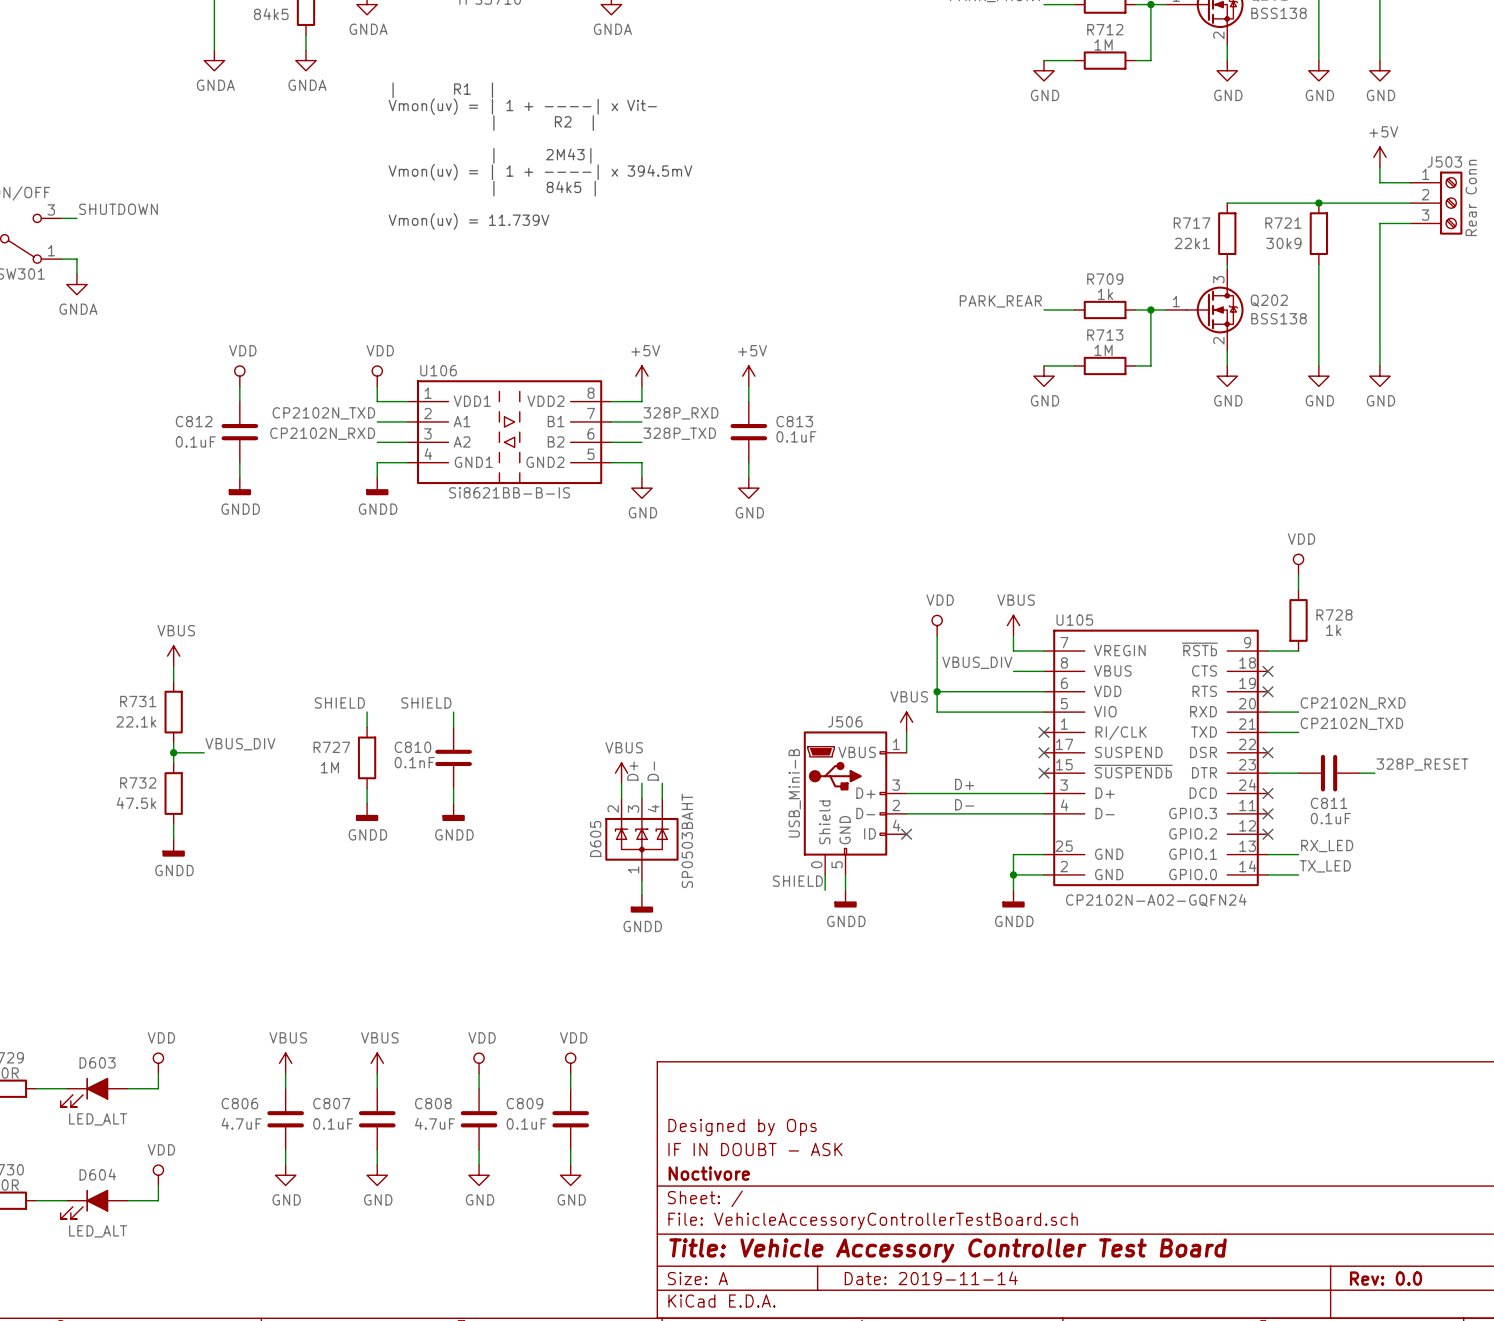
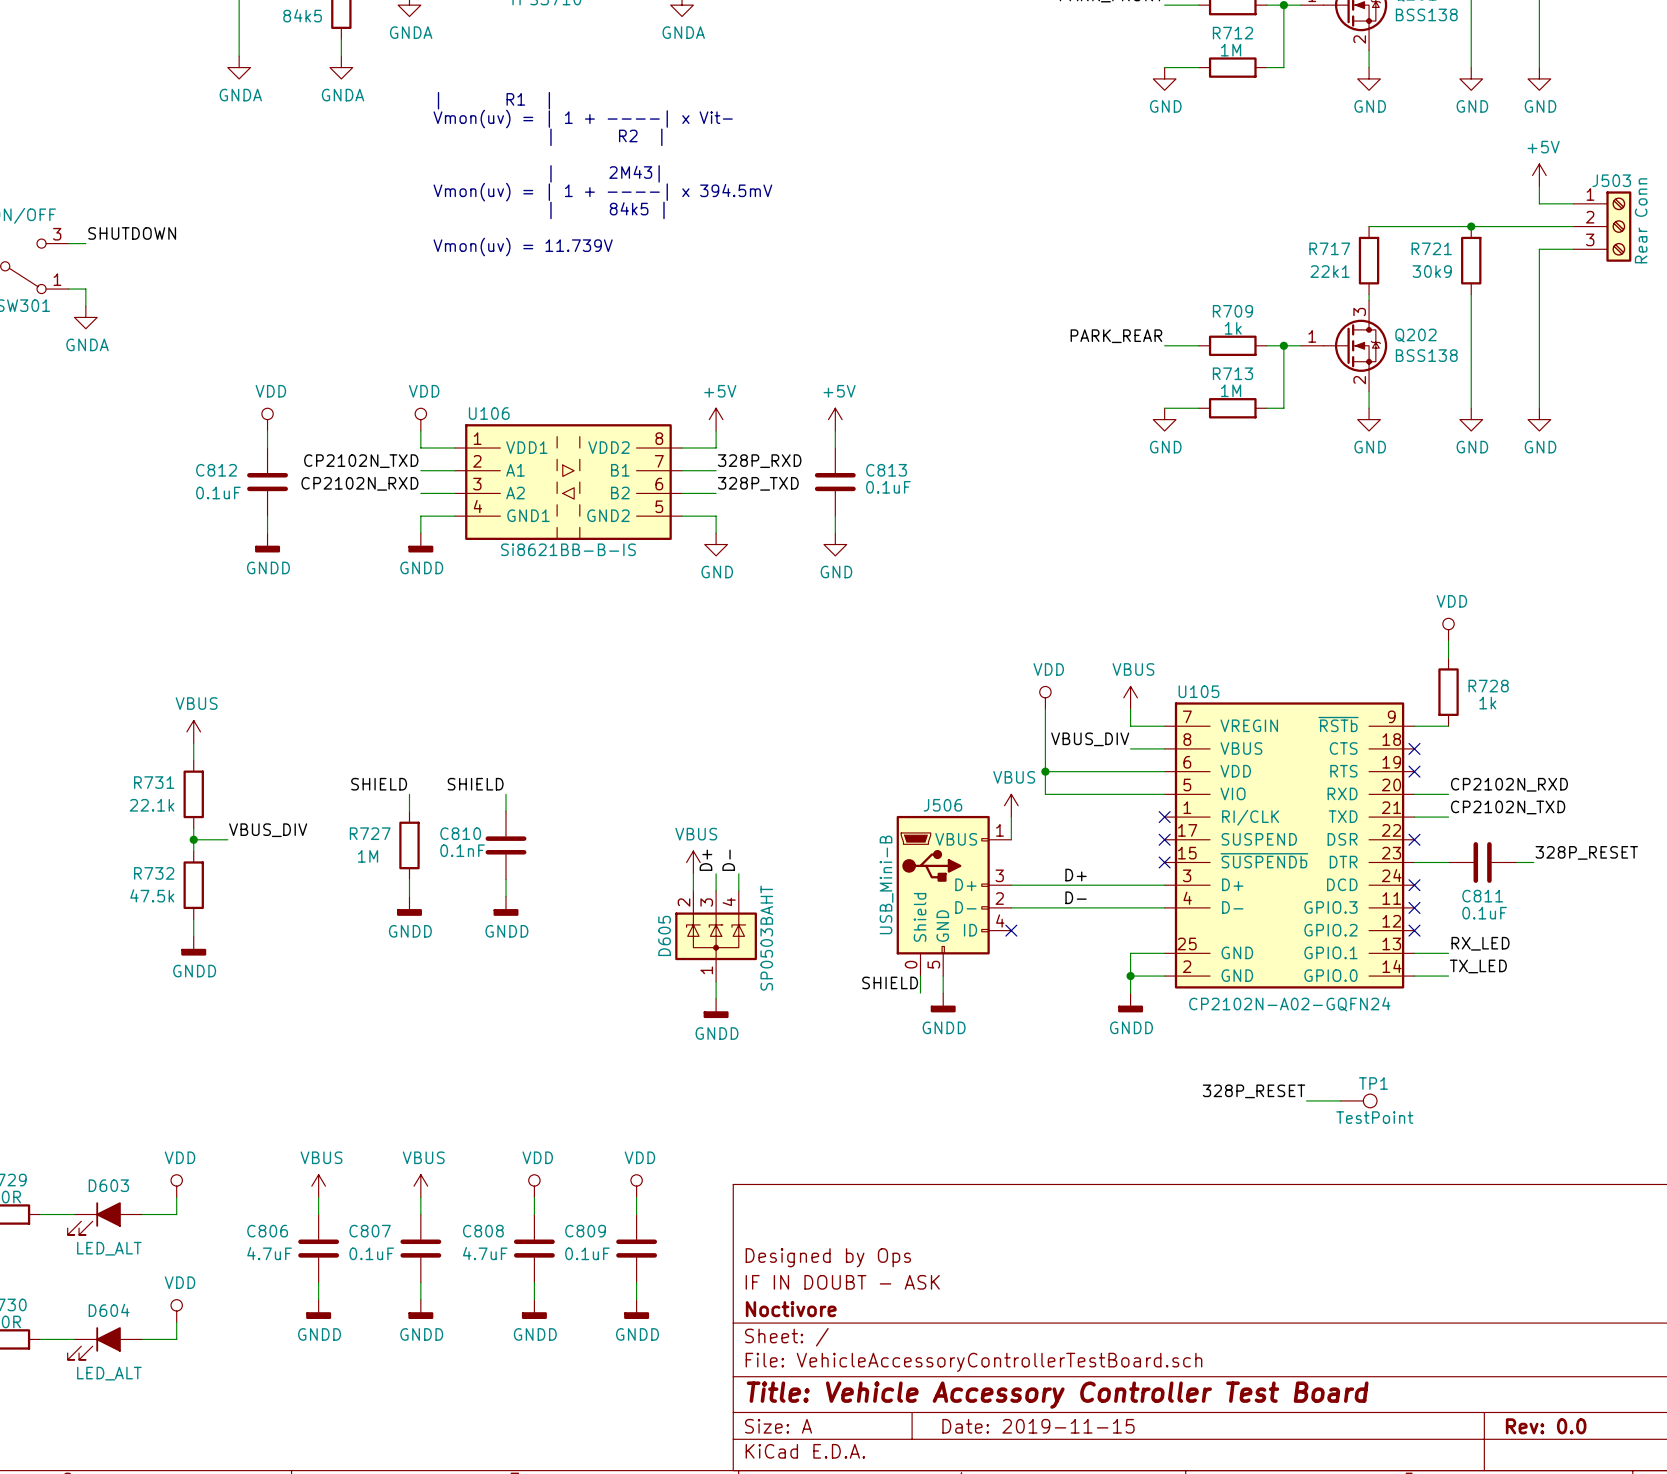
label: none -> 328P_RESET (1254, 1091)
wire: none -> (1306, 1100) (1340, 1100)
TP1: none -> TestPoint (1358, 1100)
power symbol: GND (285, 1175) -> GNDD (318, 1309)
power symbol: GND (377, 1175) -> GNDD (420, 1309)
power symbol: GND (479, 1175) -> GNDD (534, 1309)
power symbol: GND (570, 1175) -> GNDD (636, 1309)
title block: Date: 2019-11-14 (931, 1278) -> Date: 2019-11-15 (1038, 1426)

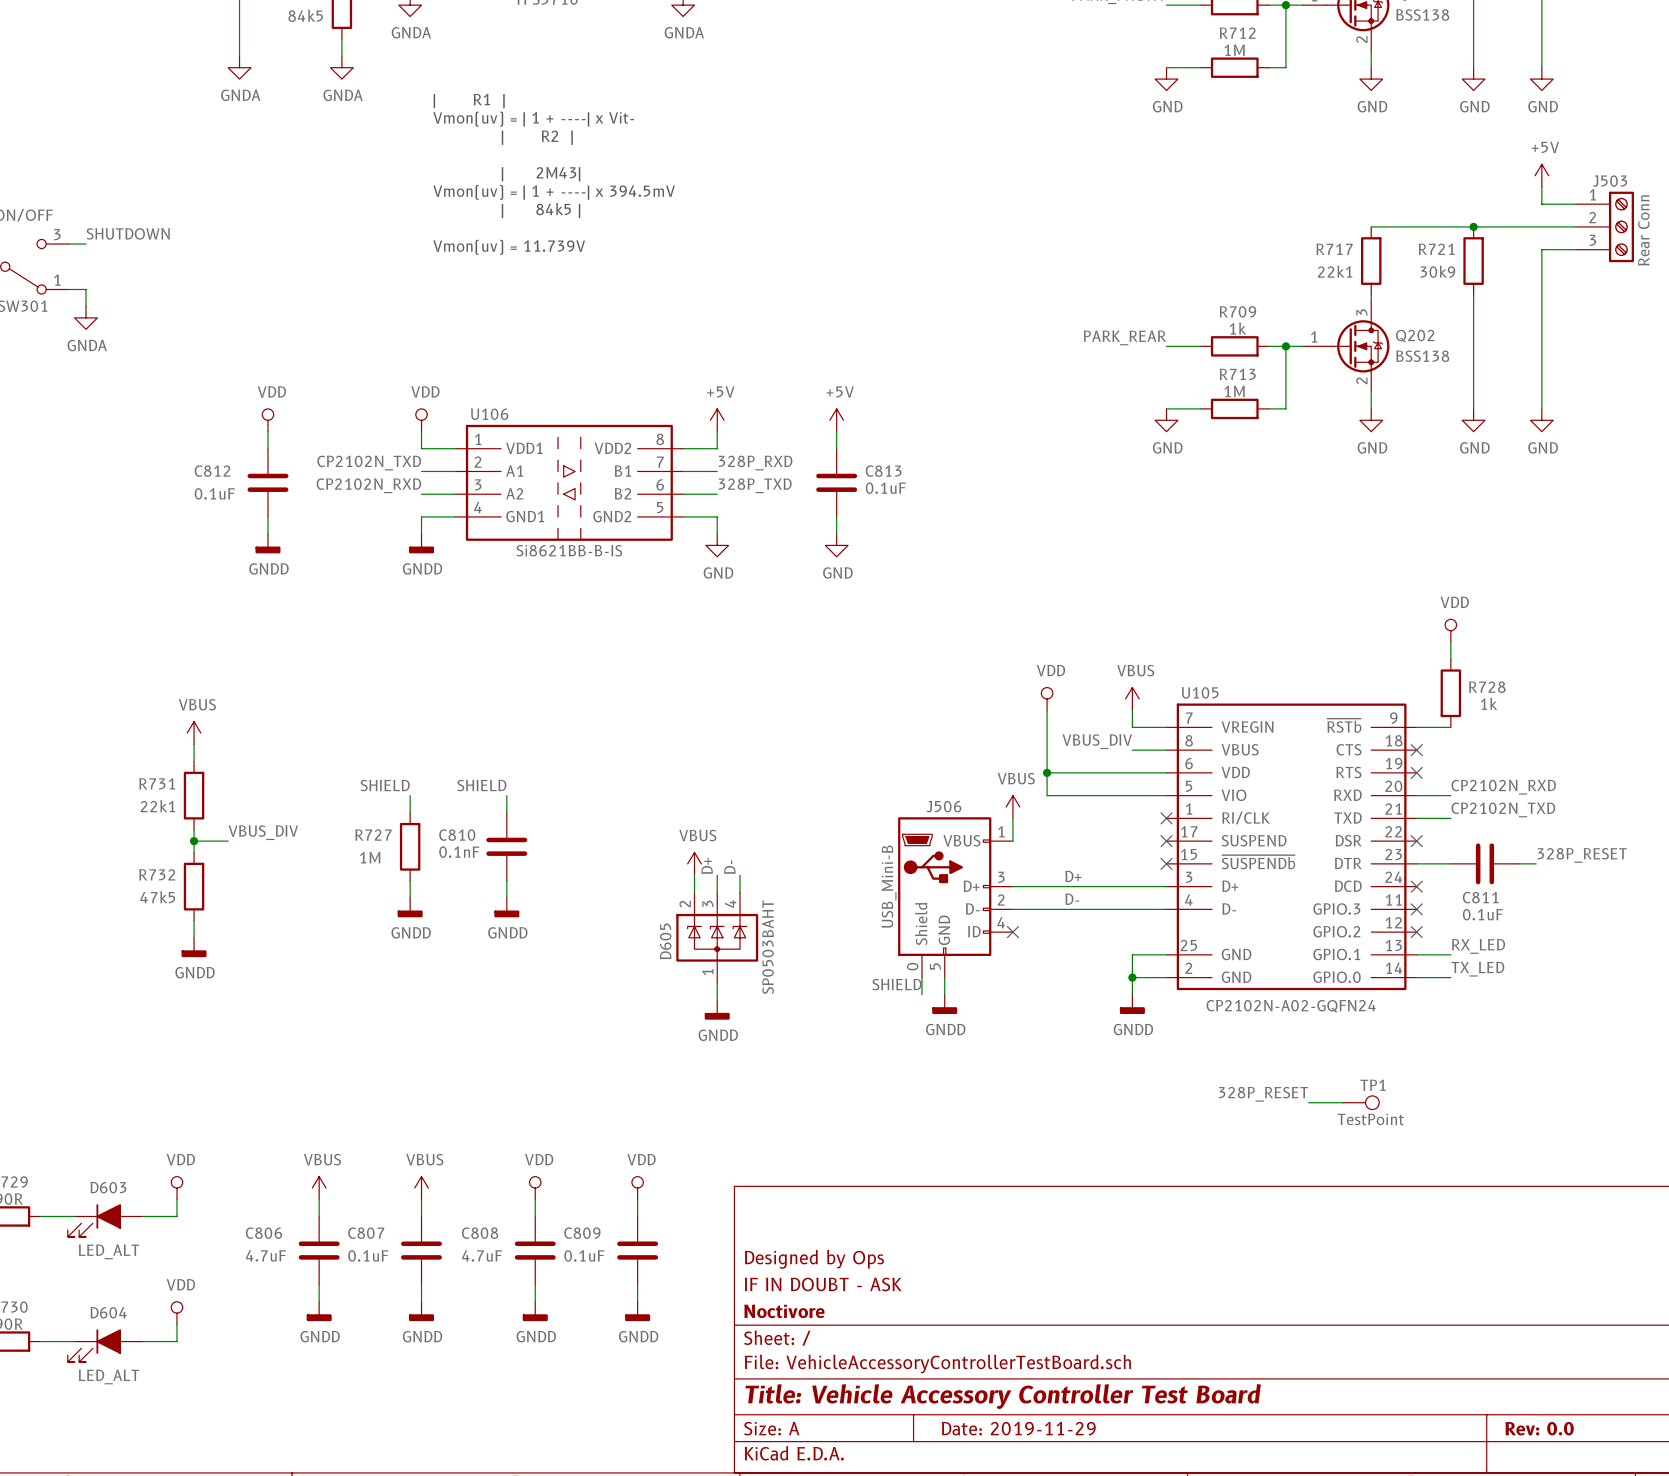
R731 value: 22.1k (152, 805) -> 22k1 (157, 806)
R732 value: 47.5k (152, 895) -> 47k5 (157, 897)
title block: Date: 2019-11-15 (1038, 1426) -> Date: 2019-11-29 (1018, 1428)

